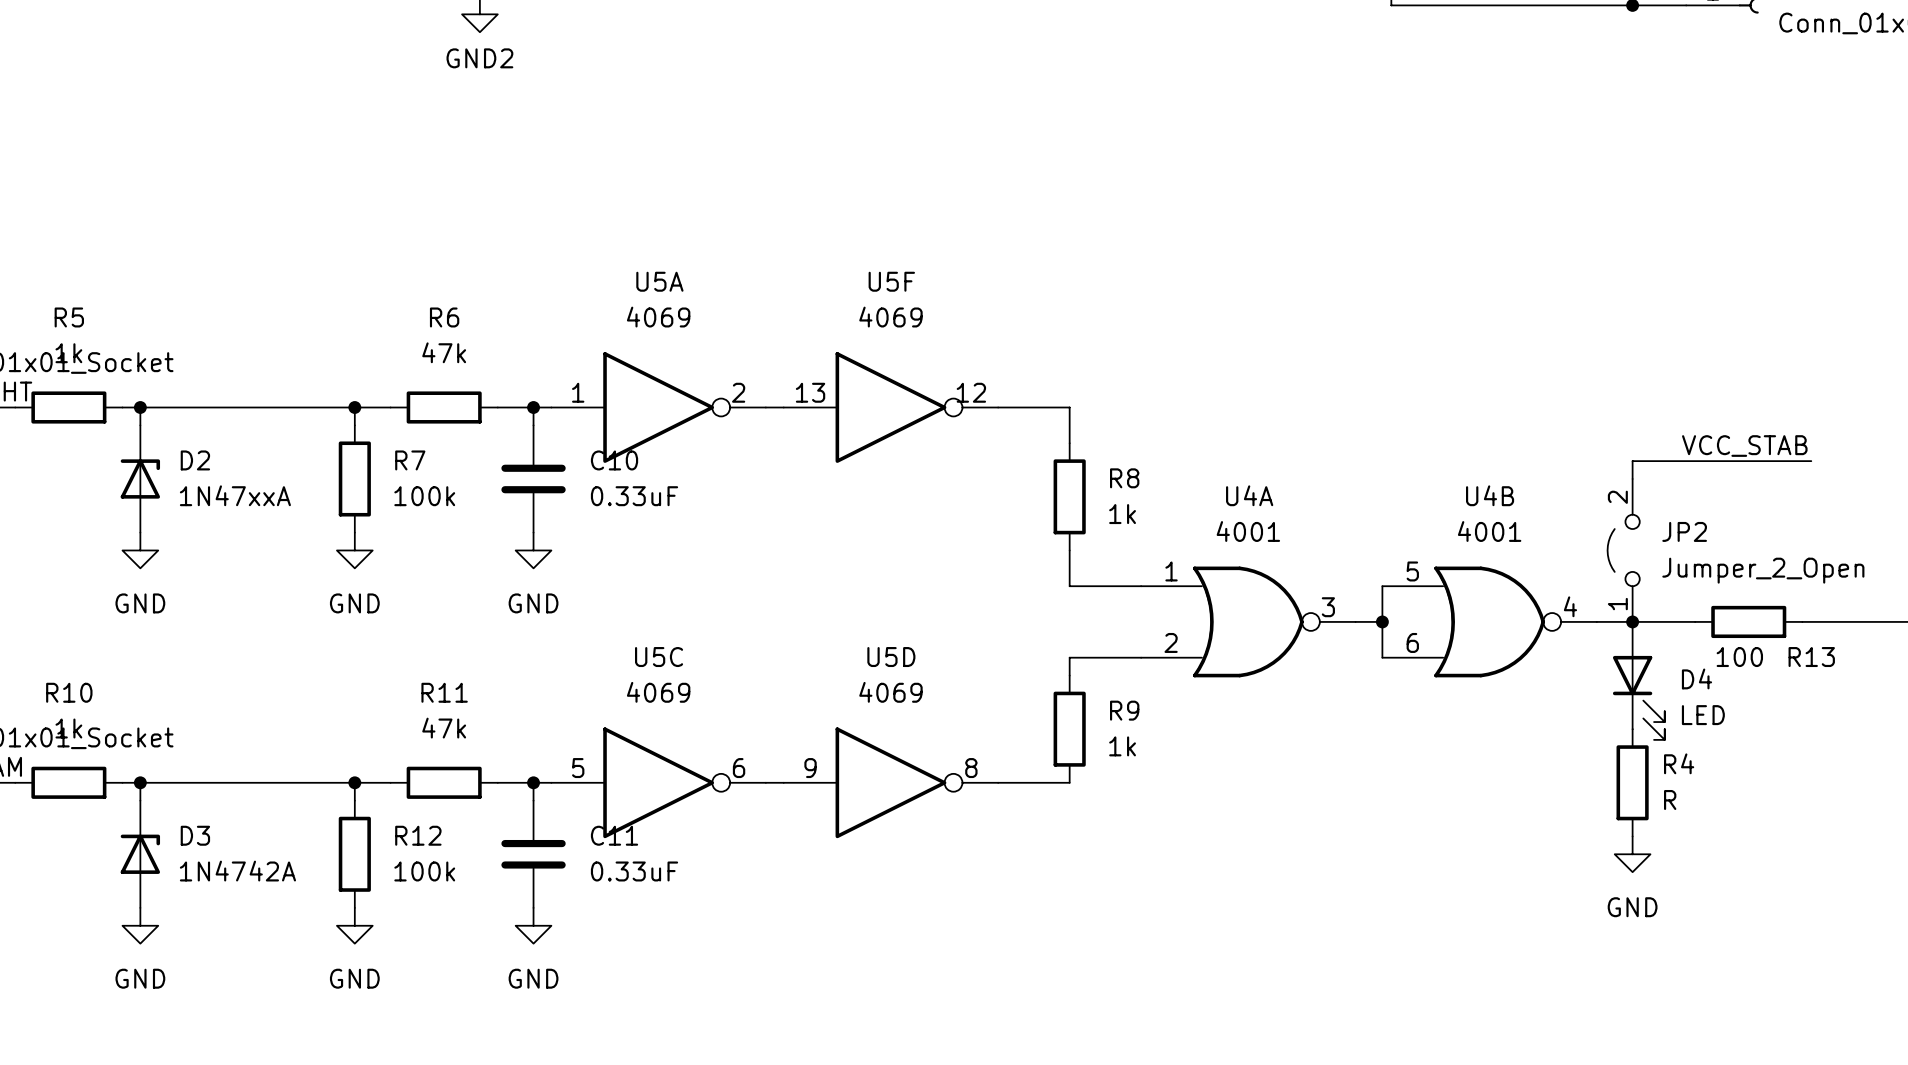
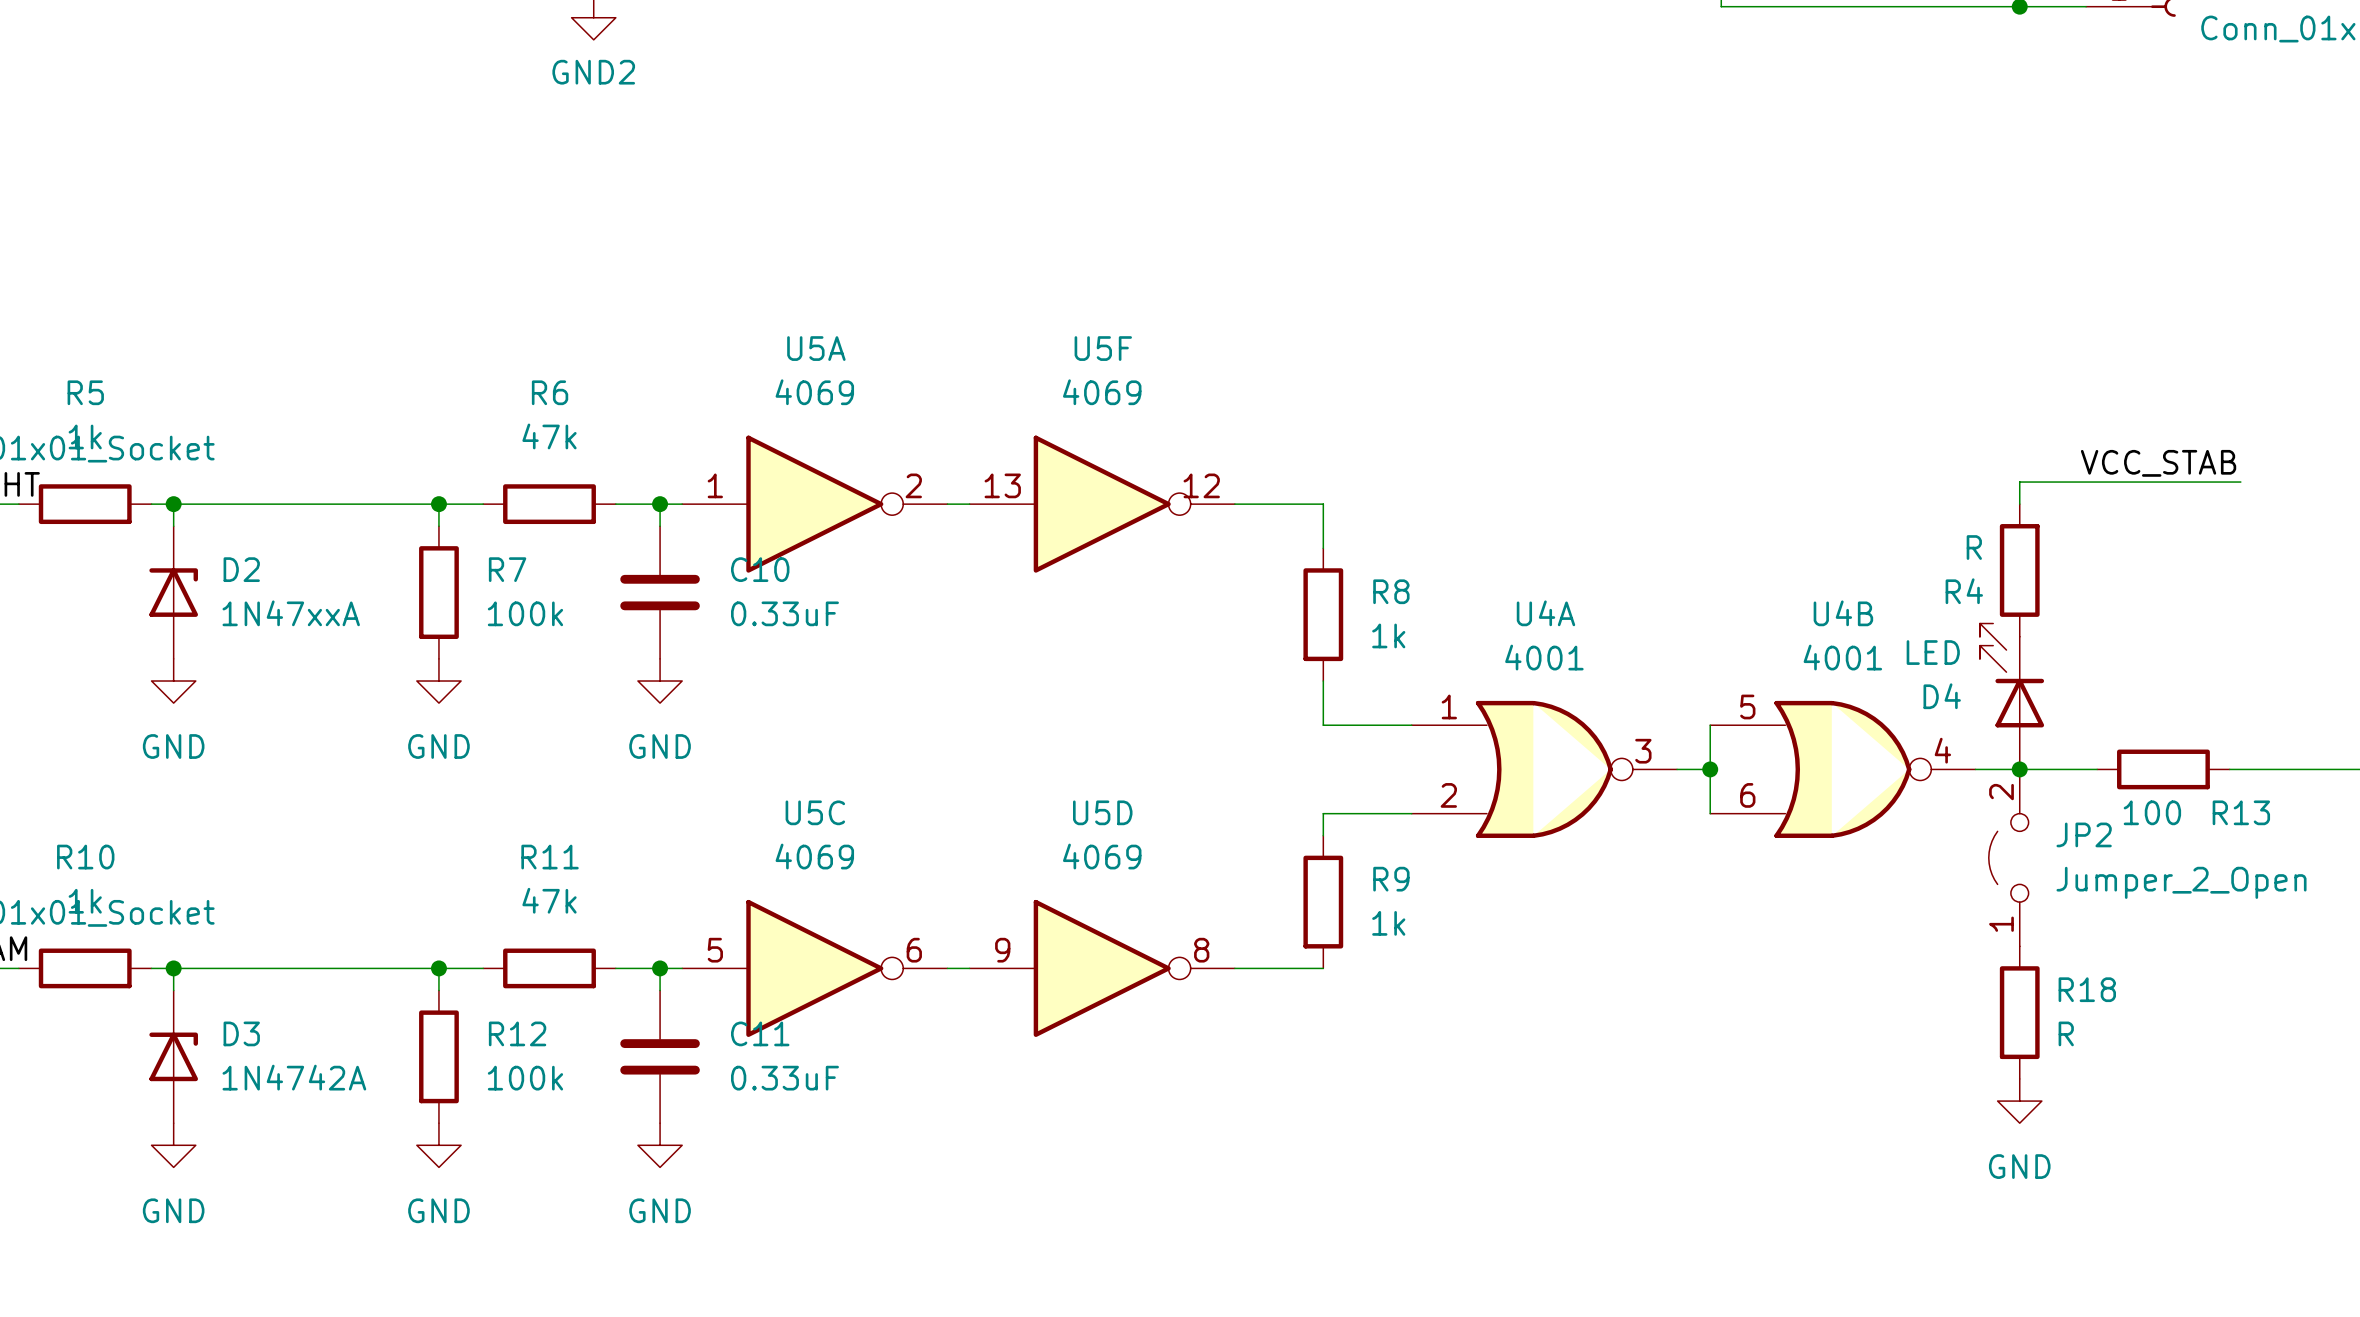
label position: VCC_STAB (1744, 446) -> VCC_STAB (2158, 463)
wire: (1811, 461) (1632, 461) (1632, 478) -> (2240, 482) (2019, 482) (2019, 504)
JP2 position: (1623, 550) -> (2008, 857)
D4 position: (1638, 680) -> (2012, 696)
D4 rotation: 0° (1638, 697) -> 180° (2012, 675)
R4 name position: R4 (1679, 763) -> R4 (1964, 591)
R4 position: (1632, 782) -> (2019, 570)
R4 value position: R (1670, 800) -> R (1974, 547)
R18: none -> R (2019, 1012)
power symbol position: GND (1632, 854) -> GND (2019, 1101)

